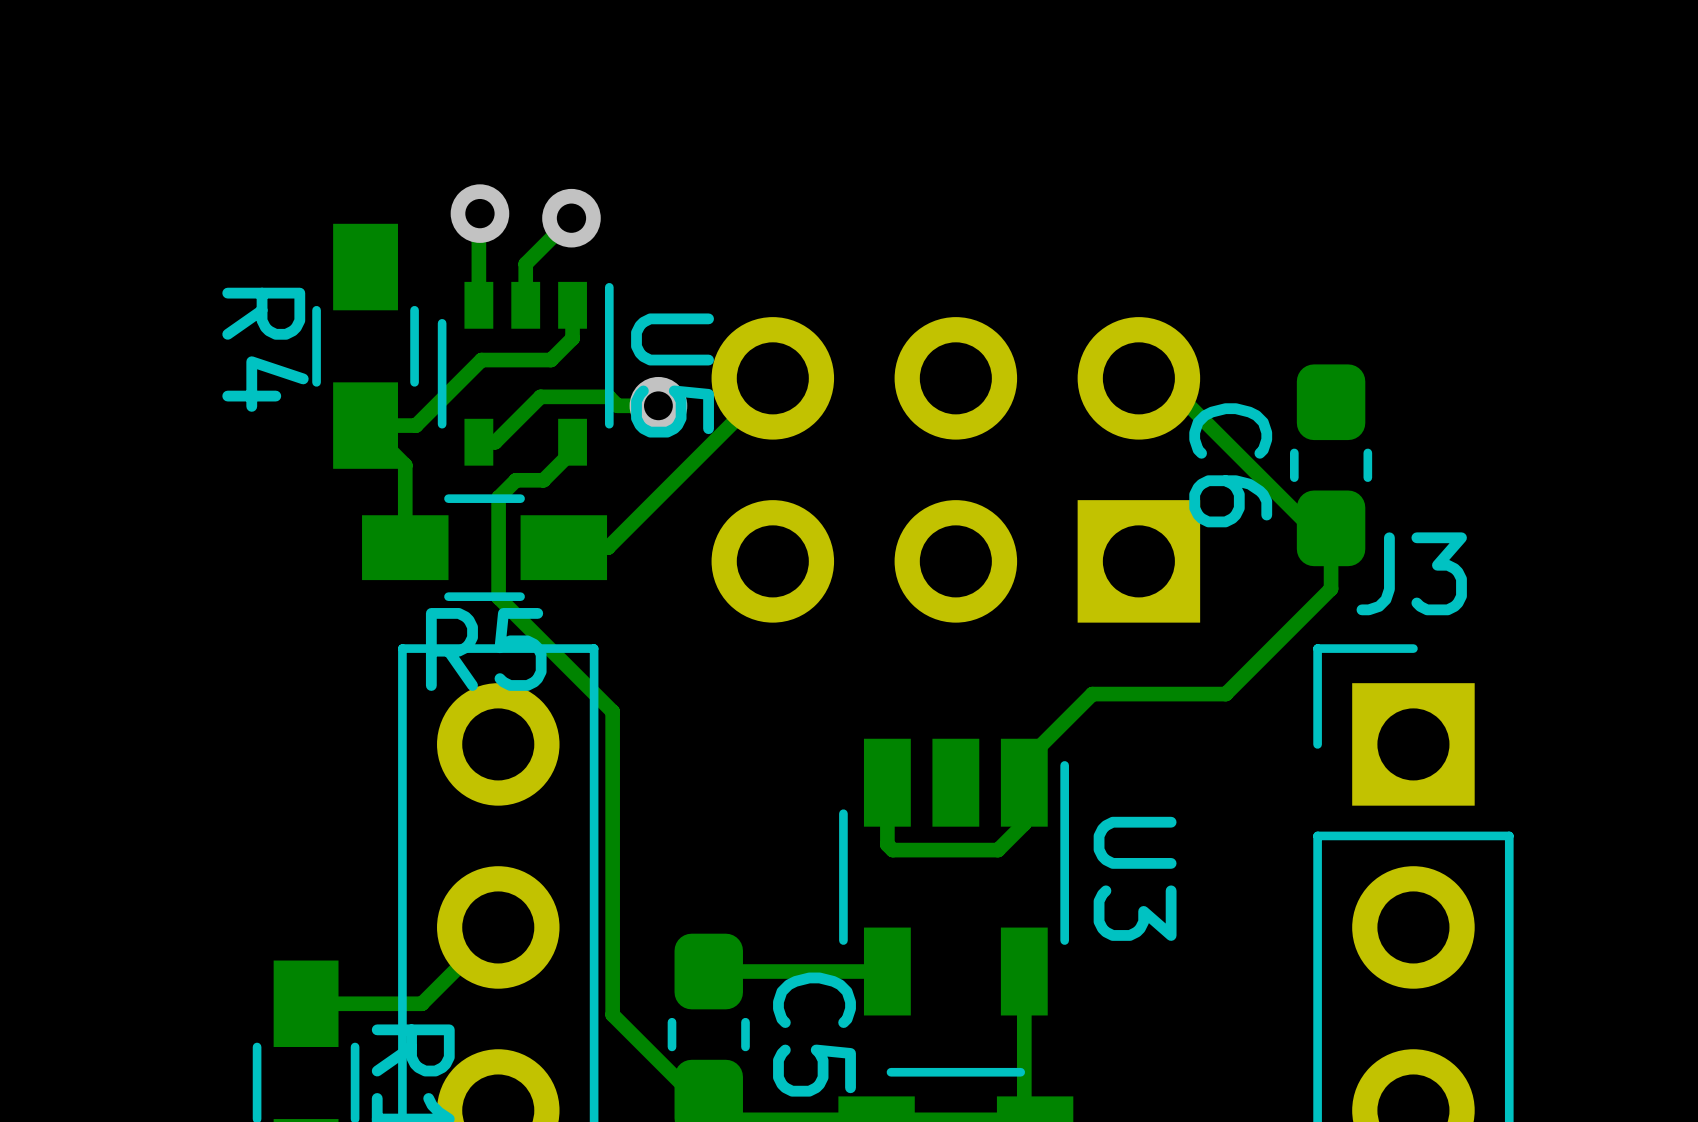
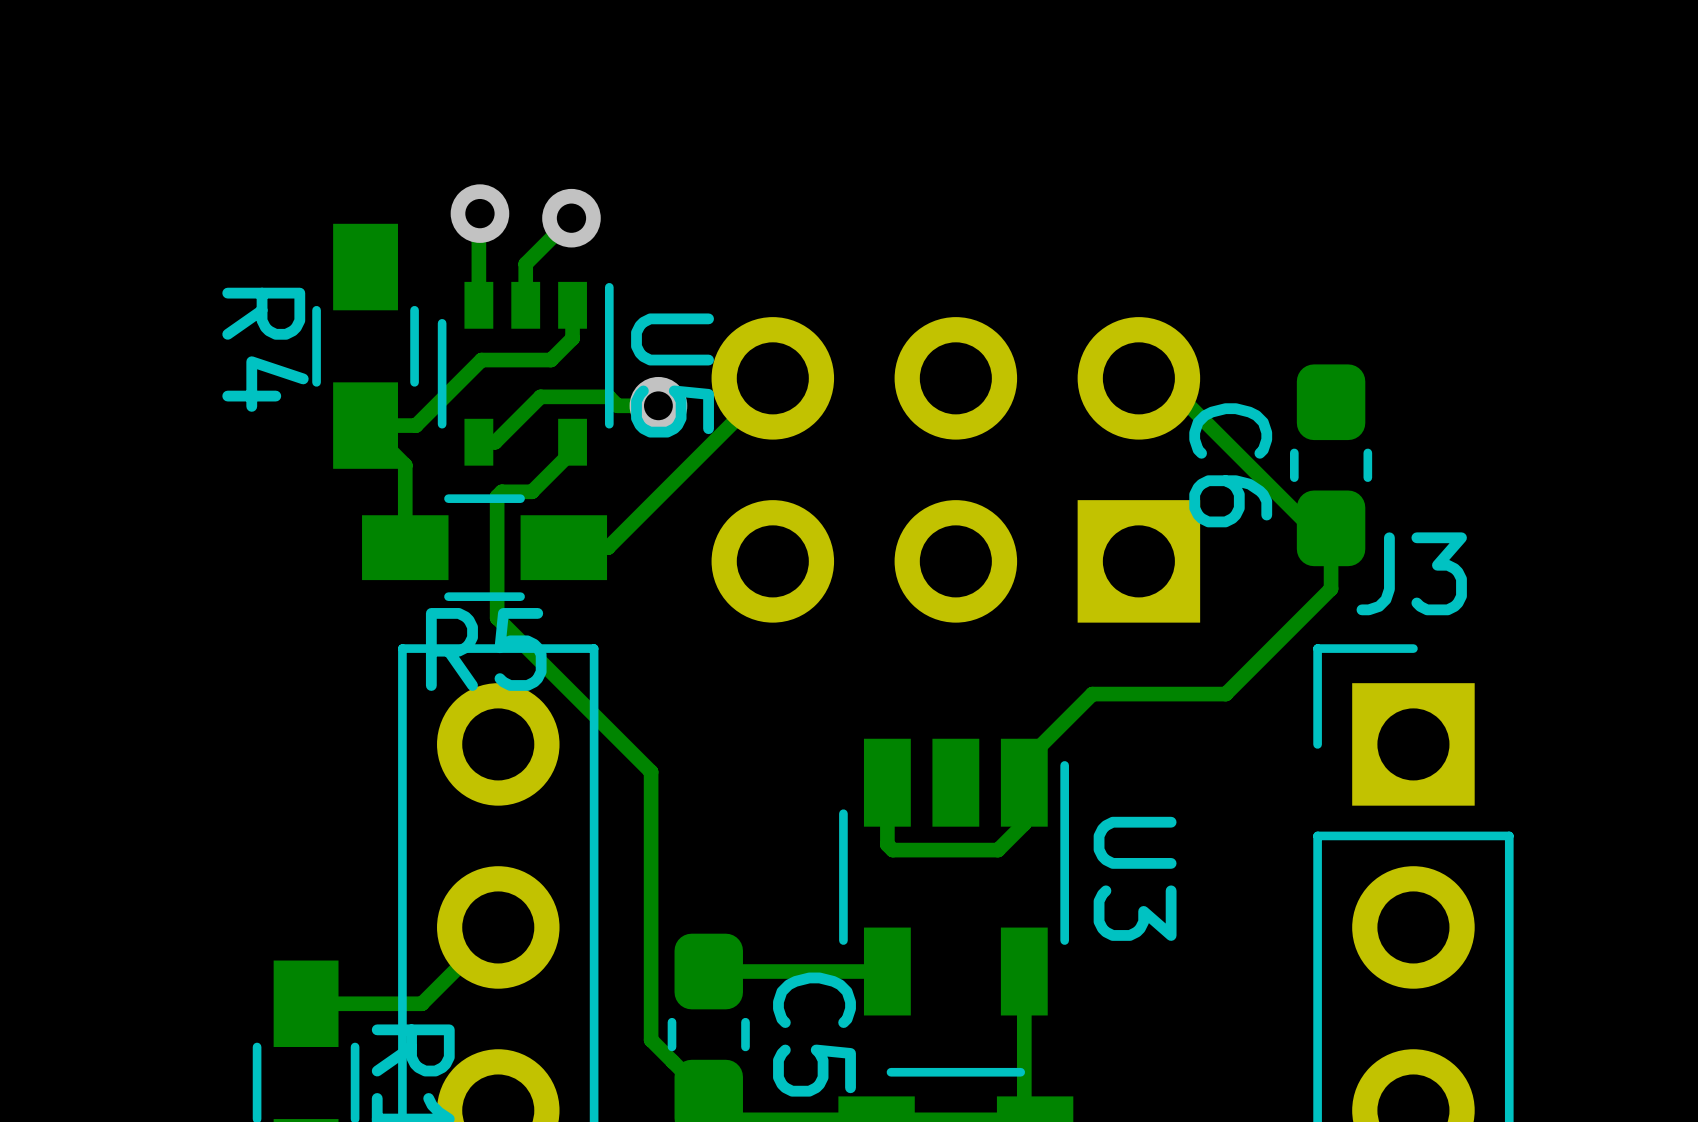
track: (543, 480) (515, 480) (498, 497) (498, 597) (612, 711) (612, 1014) (695, 1097) (708, 1097) -> (543, 480) (531, 491) (501, 491) (497, 496) (497, 617) (651, 771) (651, 1039) (708, 1097)

